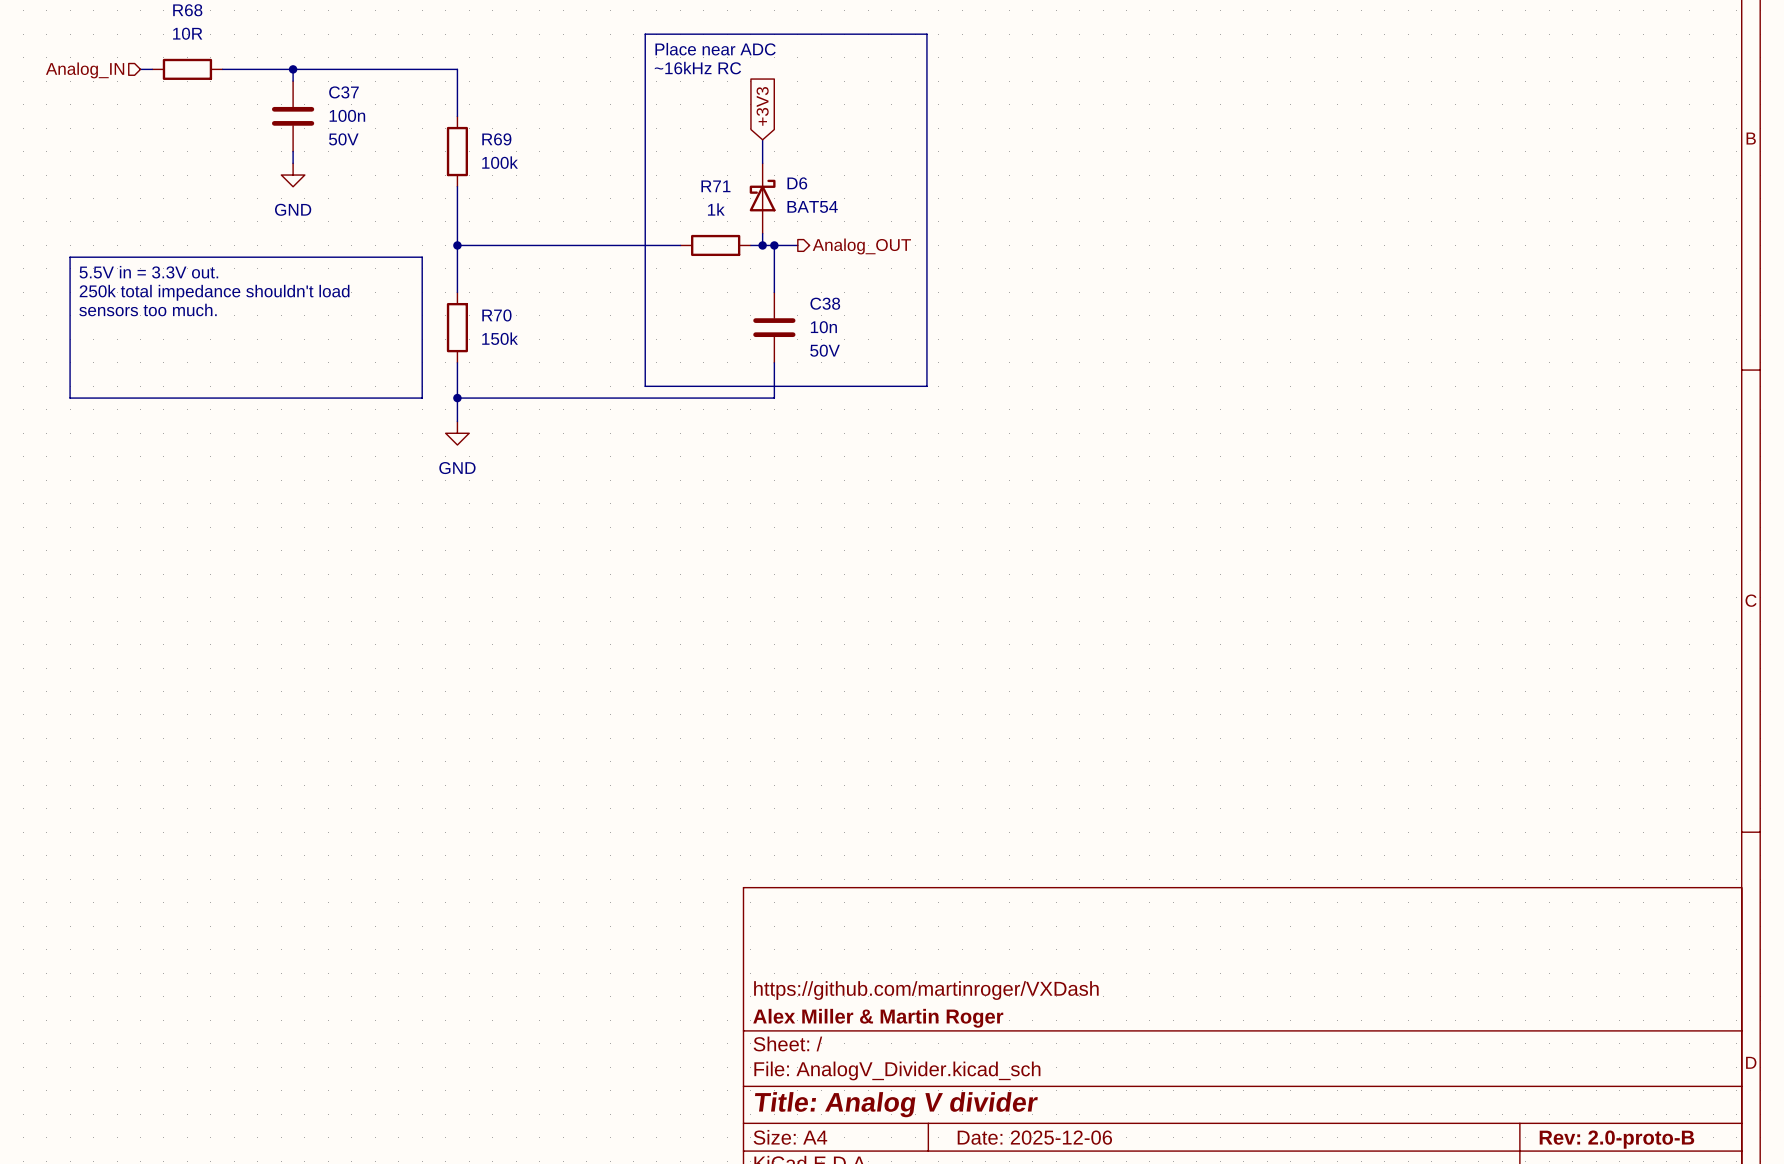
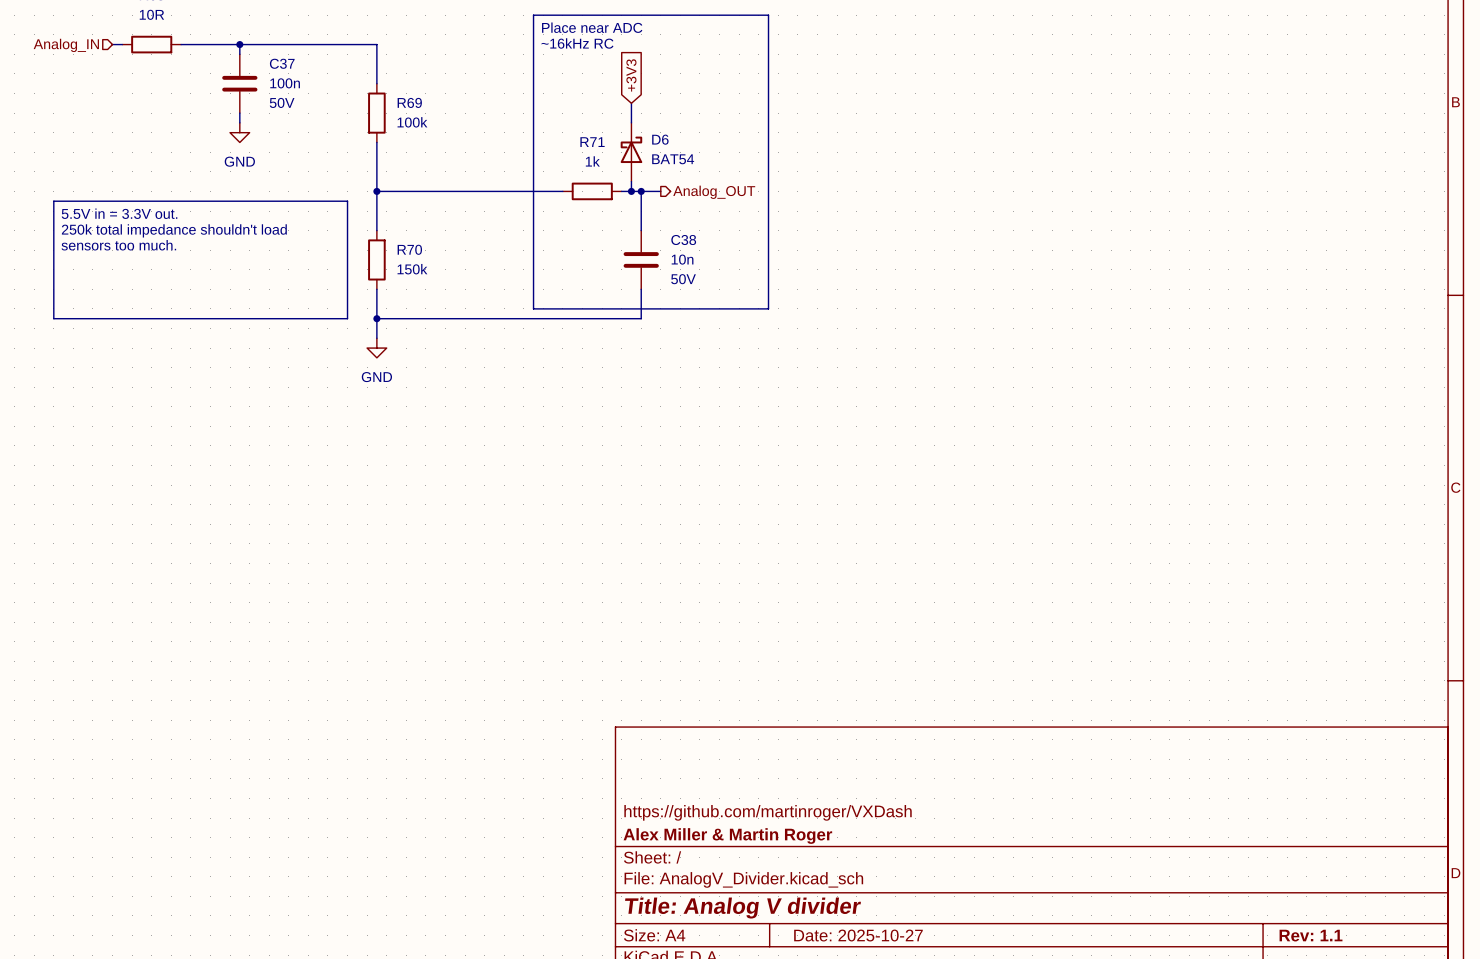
title block: Date: 2025-12-06 (1034, 1137) -> Date: 2025-10-27 (858, 935)
title block: Rev: 2.0-proto-B (1616, 1139) -> Rev: 1.1 (1311, 935)

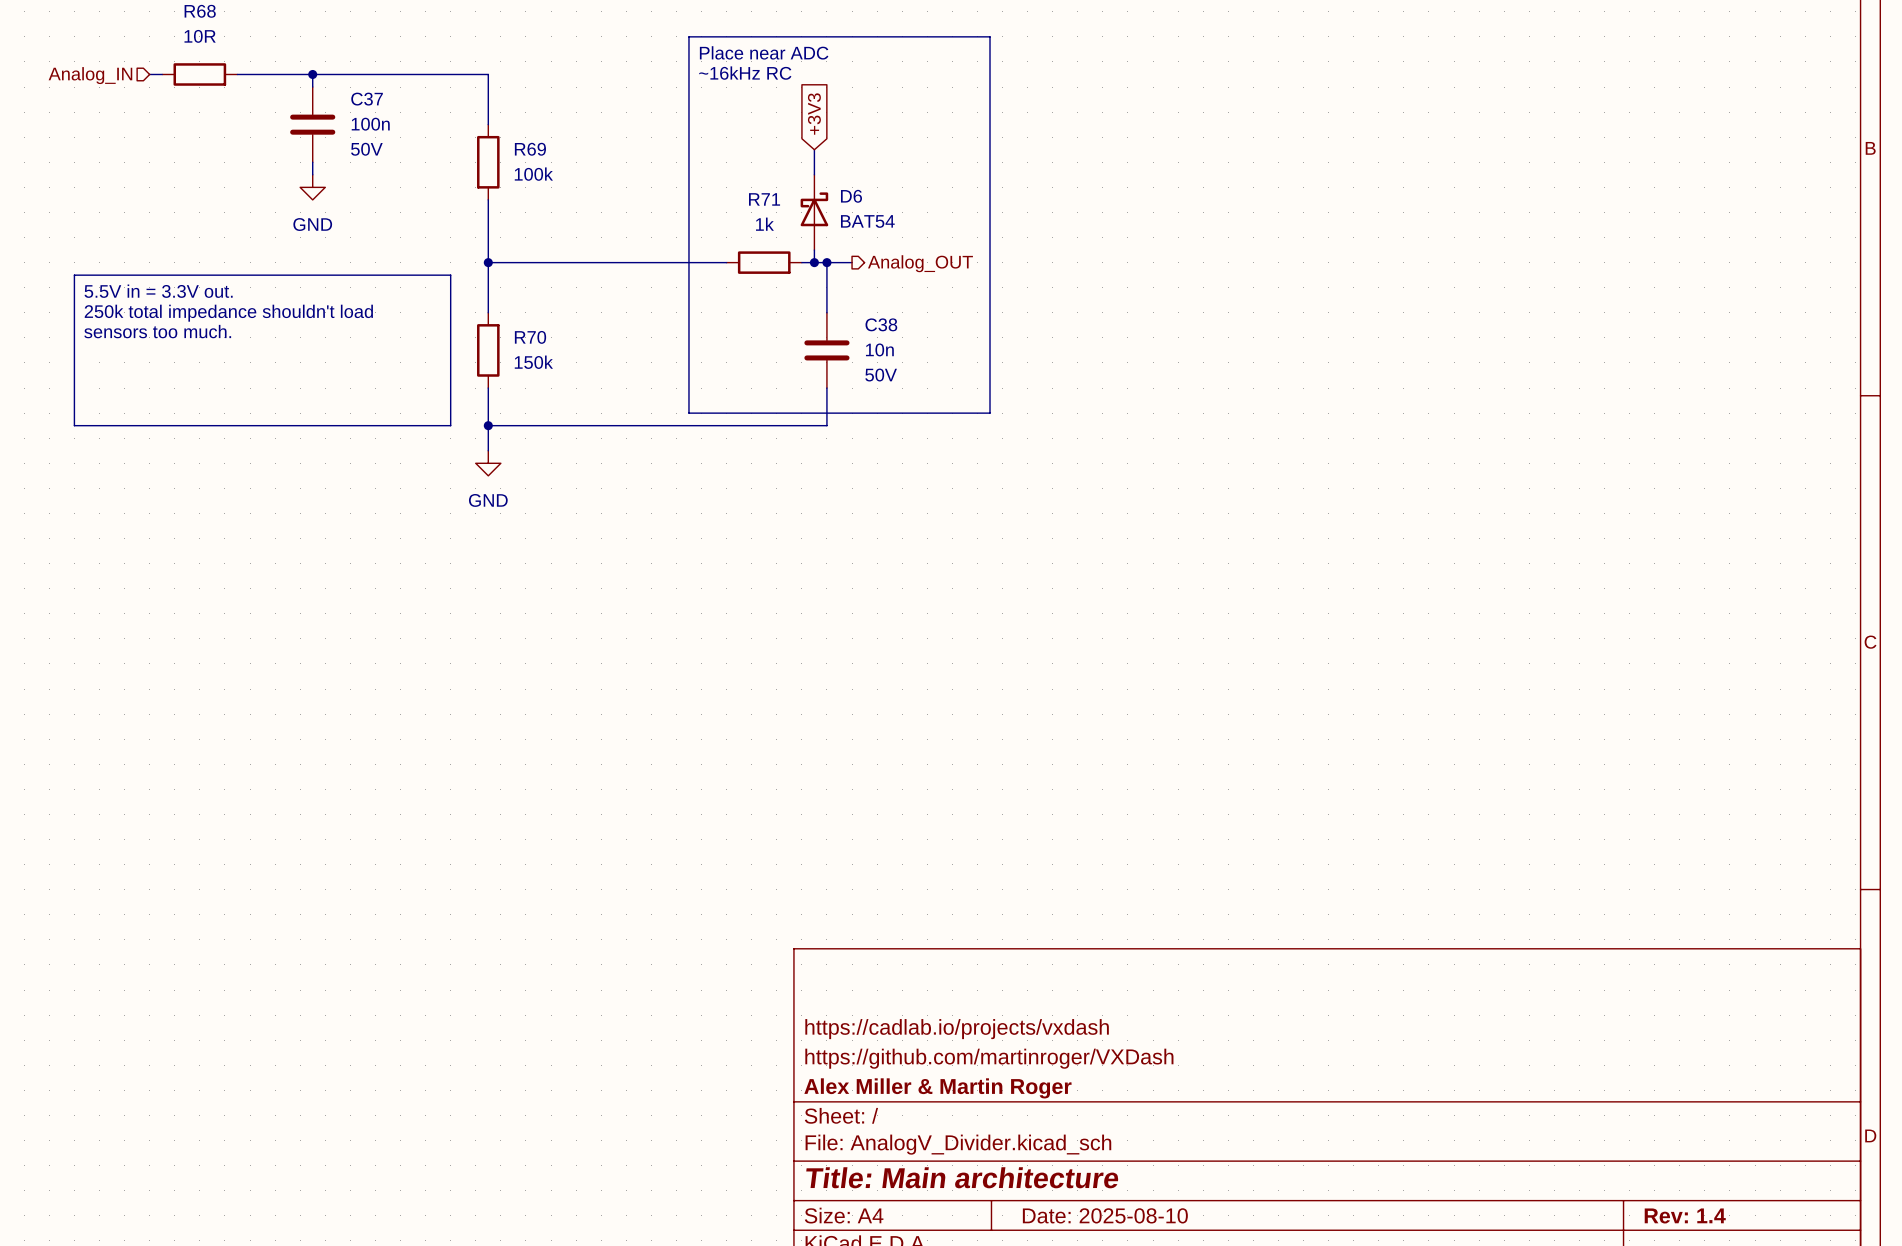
title block: none -> https://cadlab.io/projects/vxdash (957, 1029)
title block: Title: Analog V divider (742, 908) -> Title: Main architecture (962, 1177)
title block: Date: 2025-10-27 (858, 935) -> Date: 2025-08-10 (1105, 1215)
title block: Rev: 1.1 (1311, 935) -> Rev: 1.4 (1685, 1215)

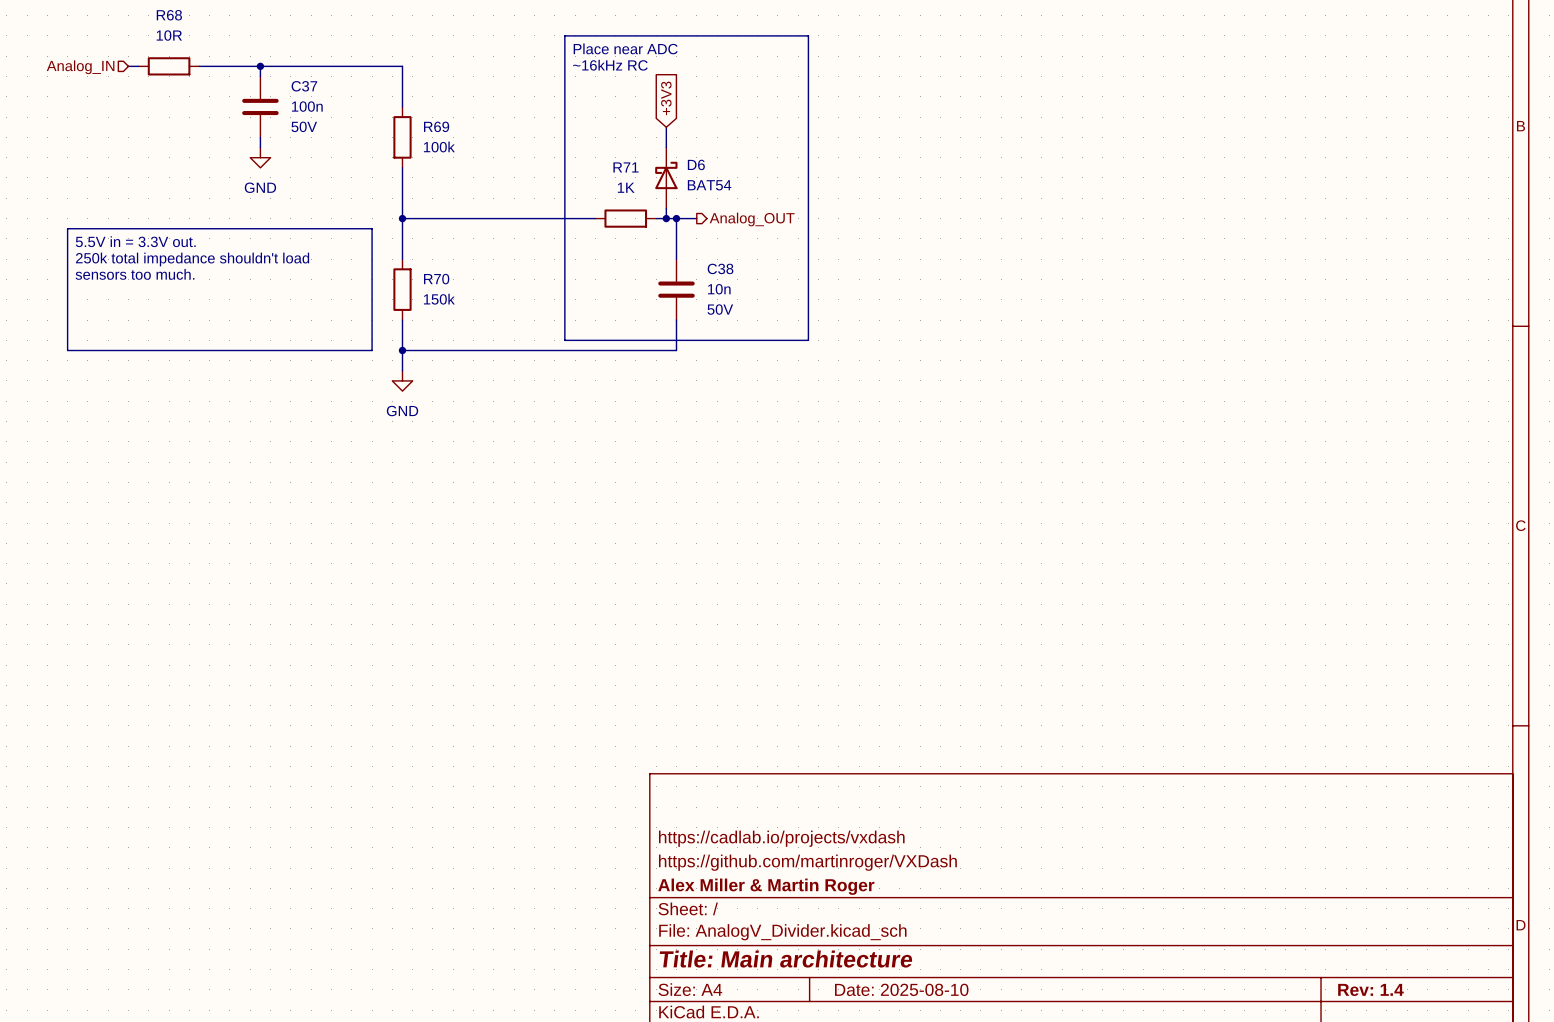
R71 value: 1k (764, 224) -> 1K (626, 187)

